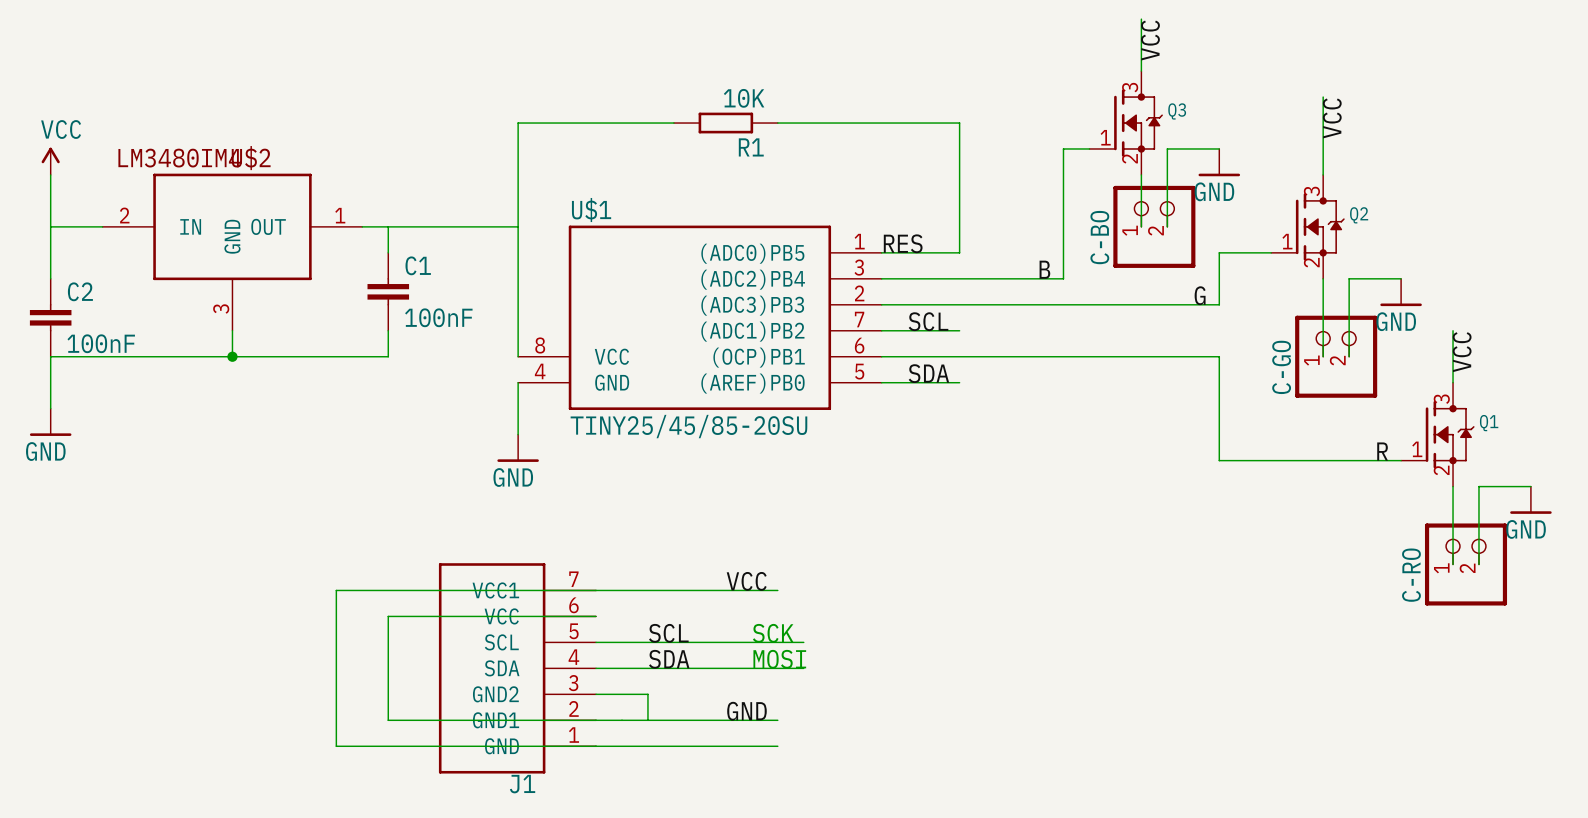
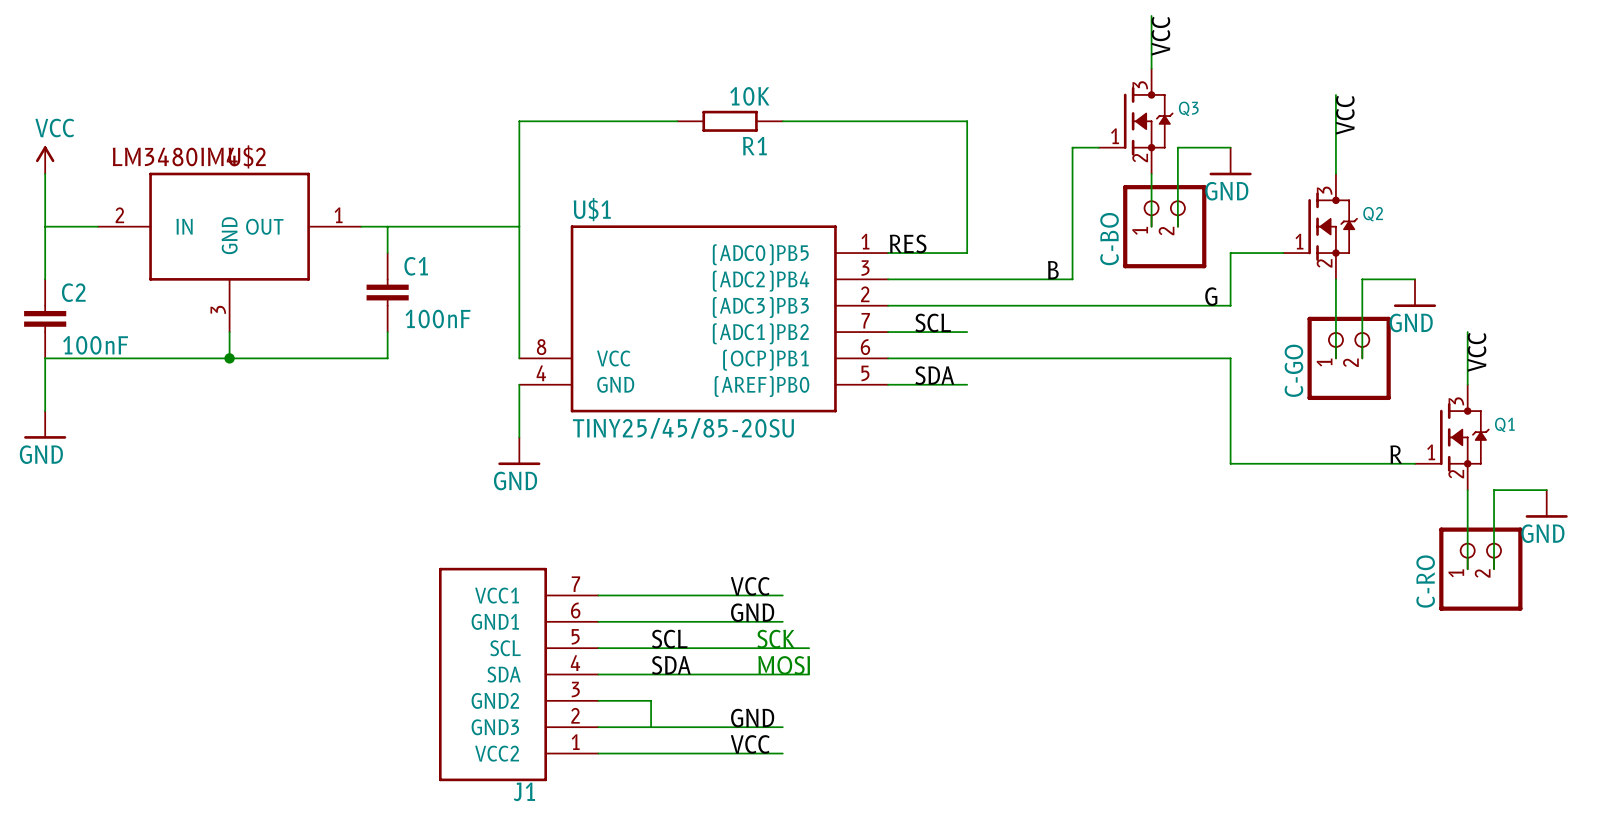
wire: (596, 590) (336, 590) (336, 746) (596, 746) -> none
label: none -> GND (752, 612)
J1 pin name: VCC (501, 616) -> GND1 (495, 621)
wire: (596, 616) (388, 616) (388, 720) (596, 720) -> (598, 621) (782, 621)
J1 pin name: GND1 (496, 720) -> GND3 (495, 727)
label: none -> VCC (750, 744)
J1 pin name: GND (501, 746) -> VCC2 (497, 753)

